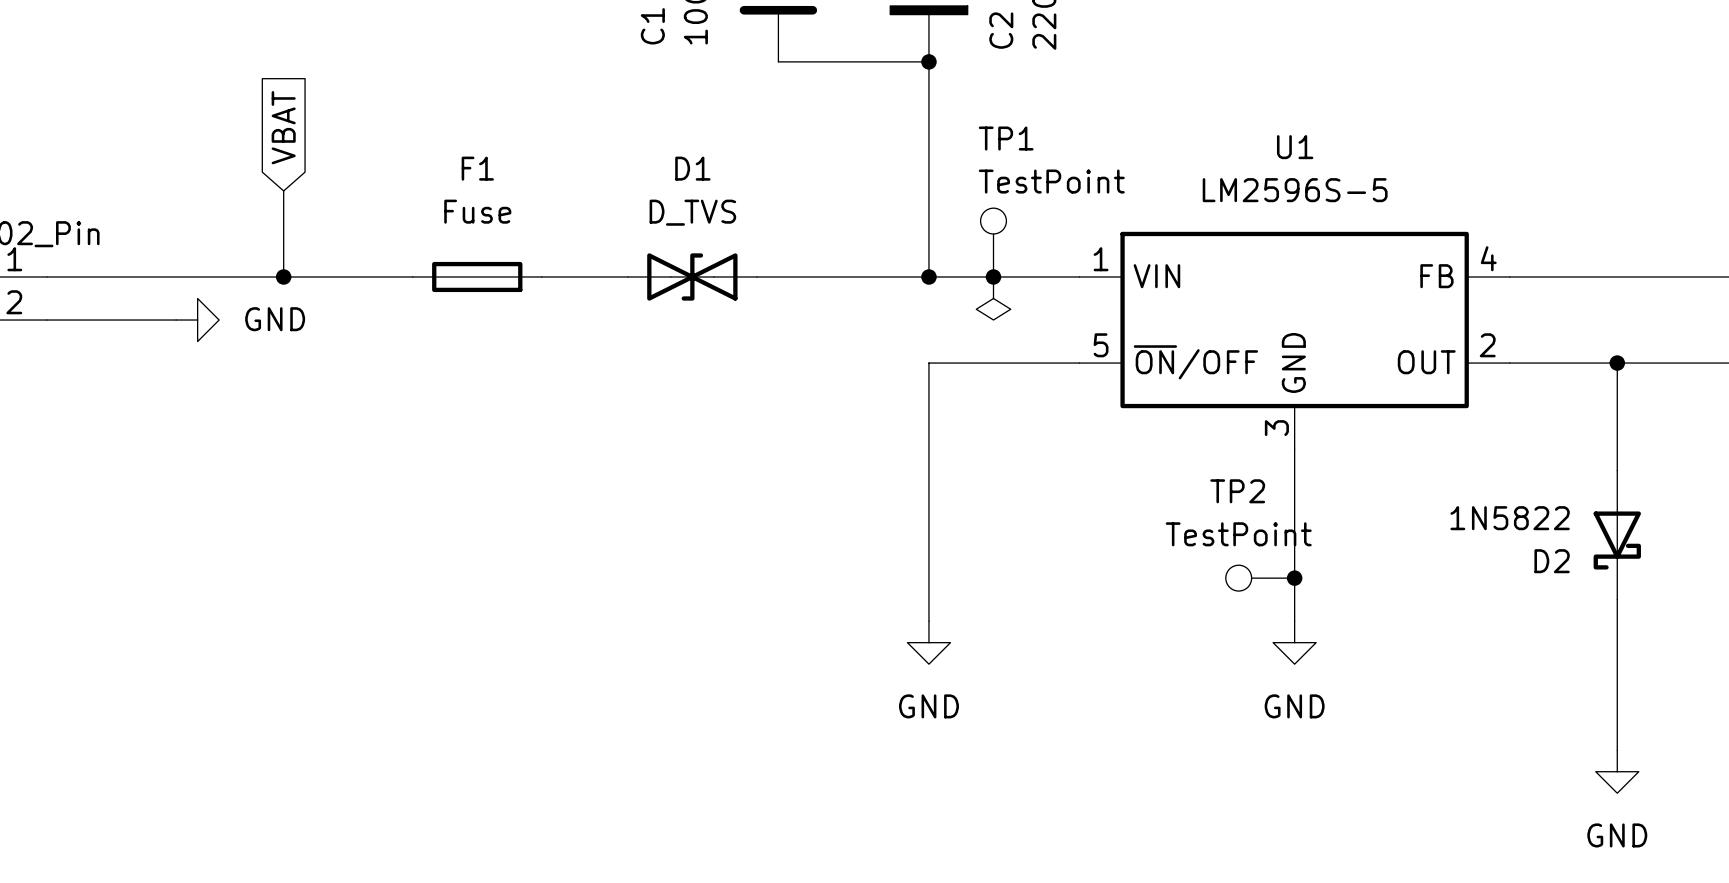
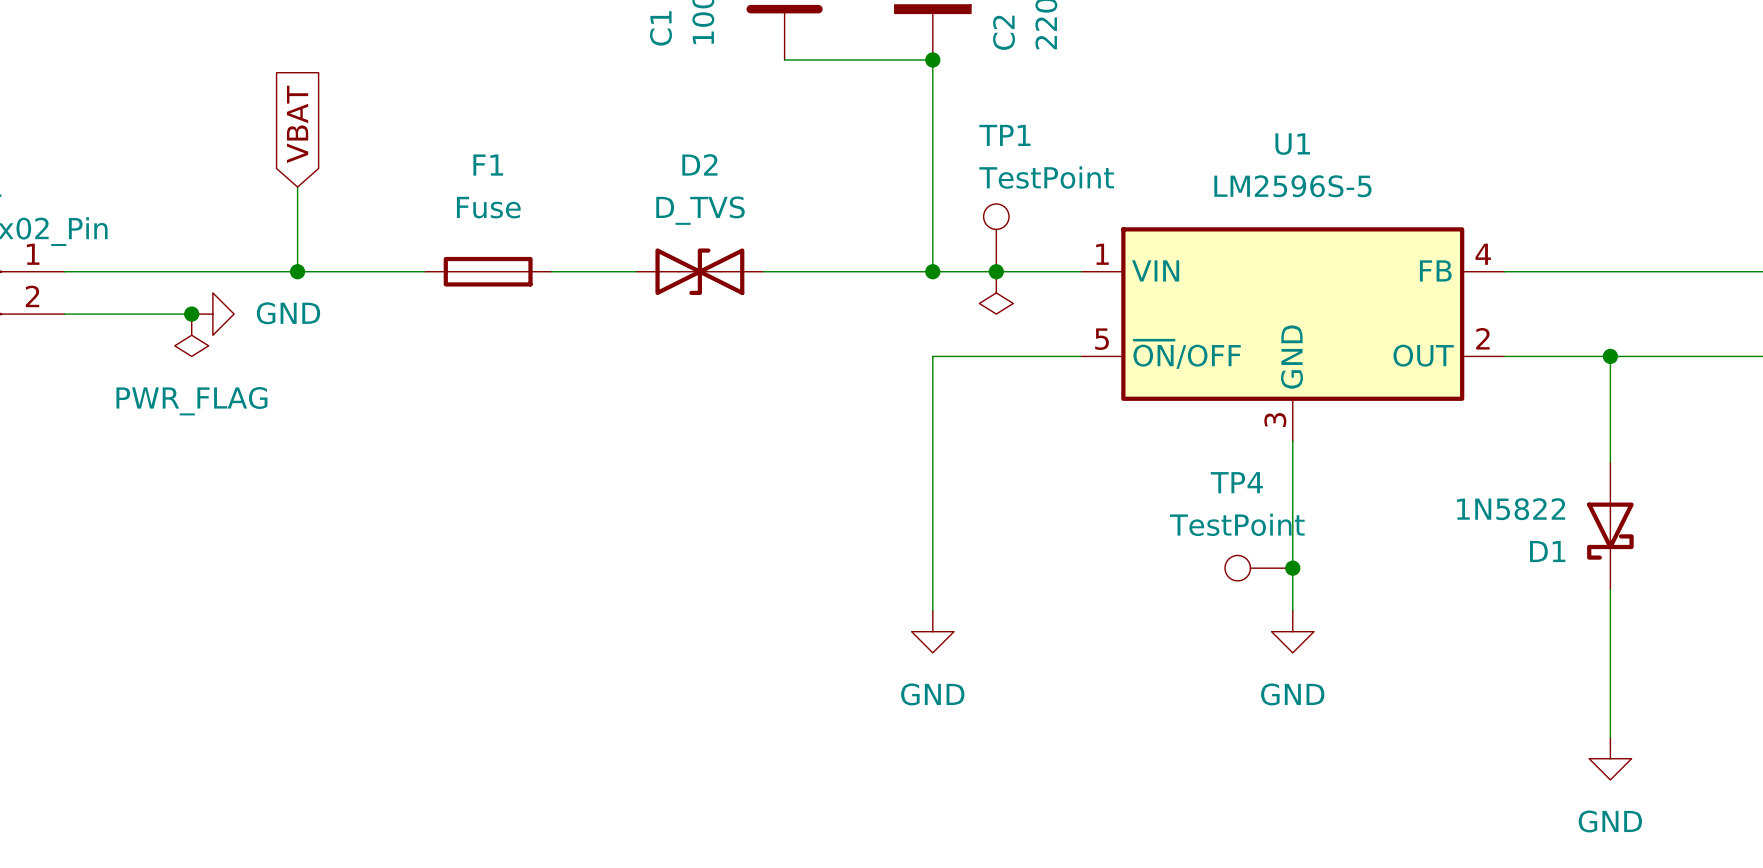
D1 name: D1 (692, 168) -> D2 (699, 164)
junction: none -> (191, 314)
power symbol: none -> PWR_FLAG (191, 335)
TP2 name: TP2 (1237, 491) -> TP4 (1236, 482)
D2 name: D2 (1552, 561) -> D1 (1547, 551)

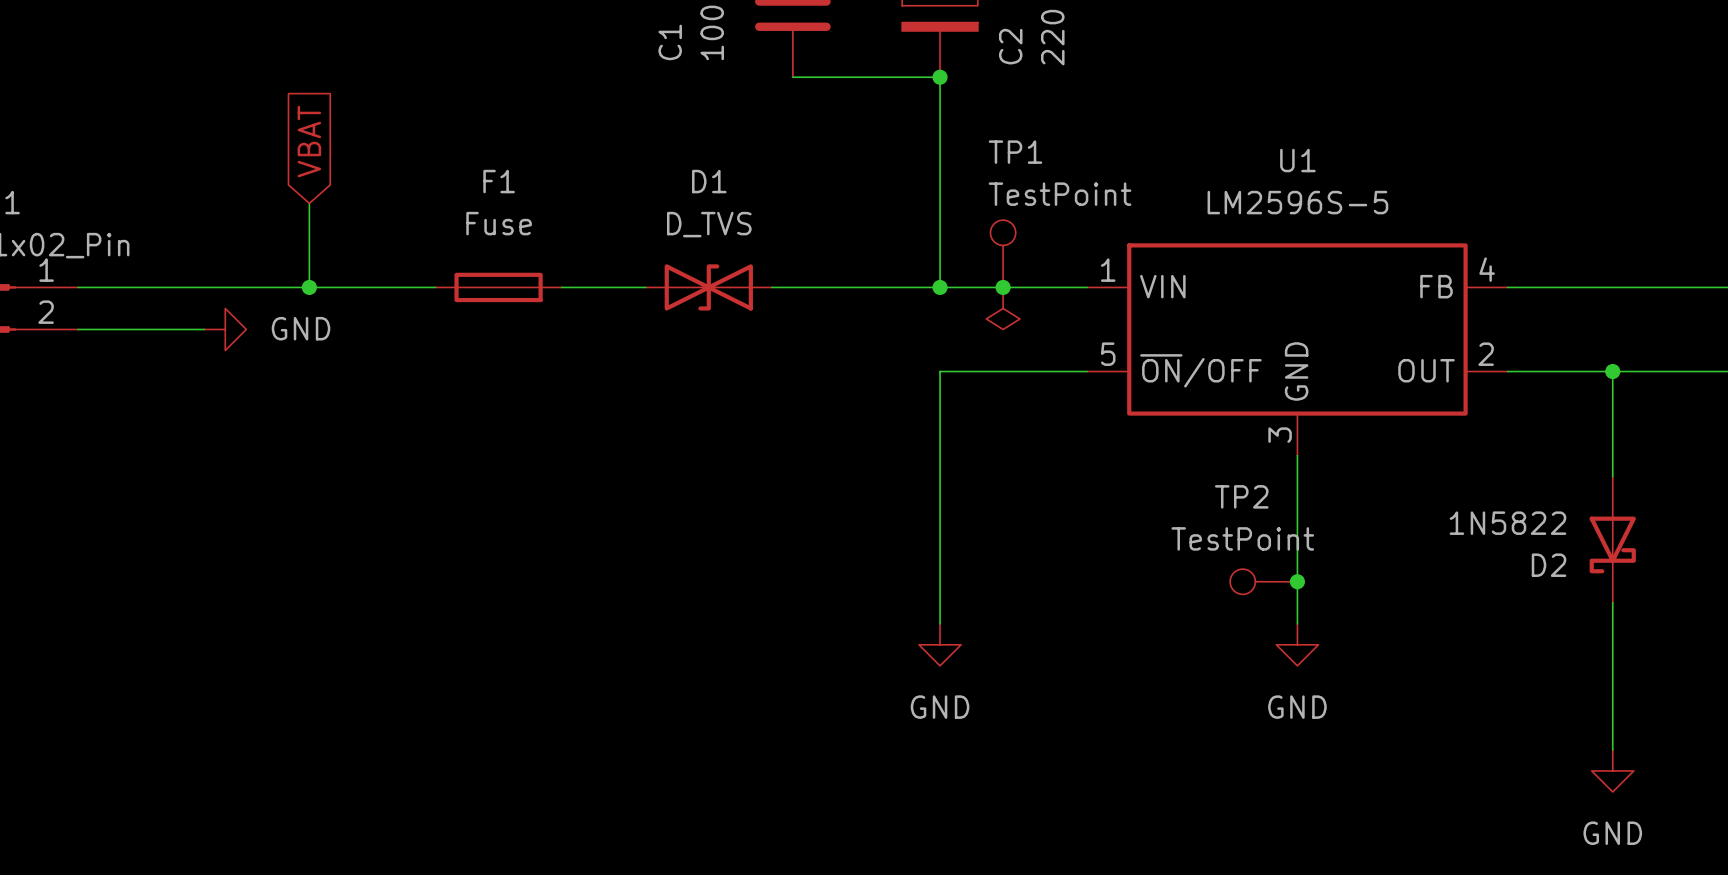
D2 name: D2 (699, 164) -> D1 (709, 181)
junction: (191, 314) -> none
power symbol: PWR_FLAG (191, 335) -> none
TP4 name: TP4 (1236, 482) -> TP2 (1241, 496)
D1 name: D1 (1547, 551) -> D2 (1549, 565)

